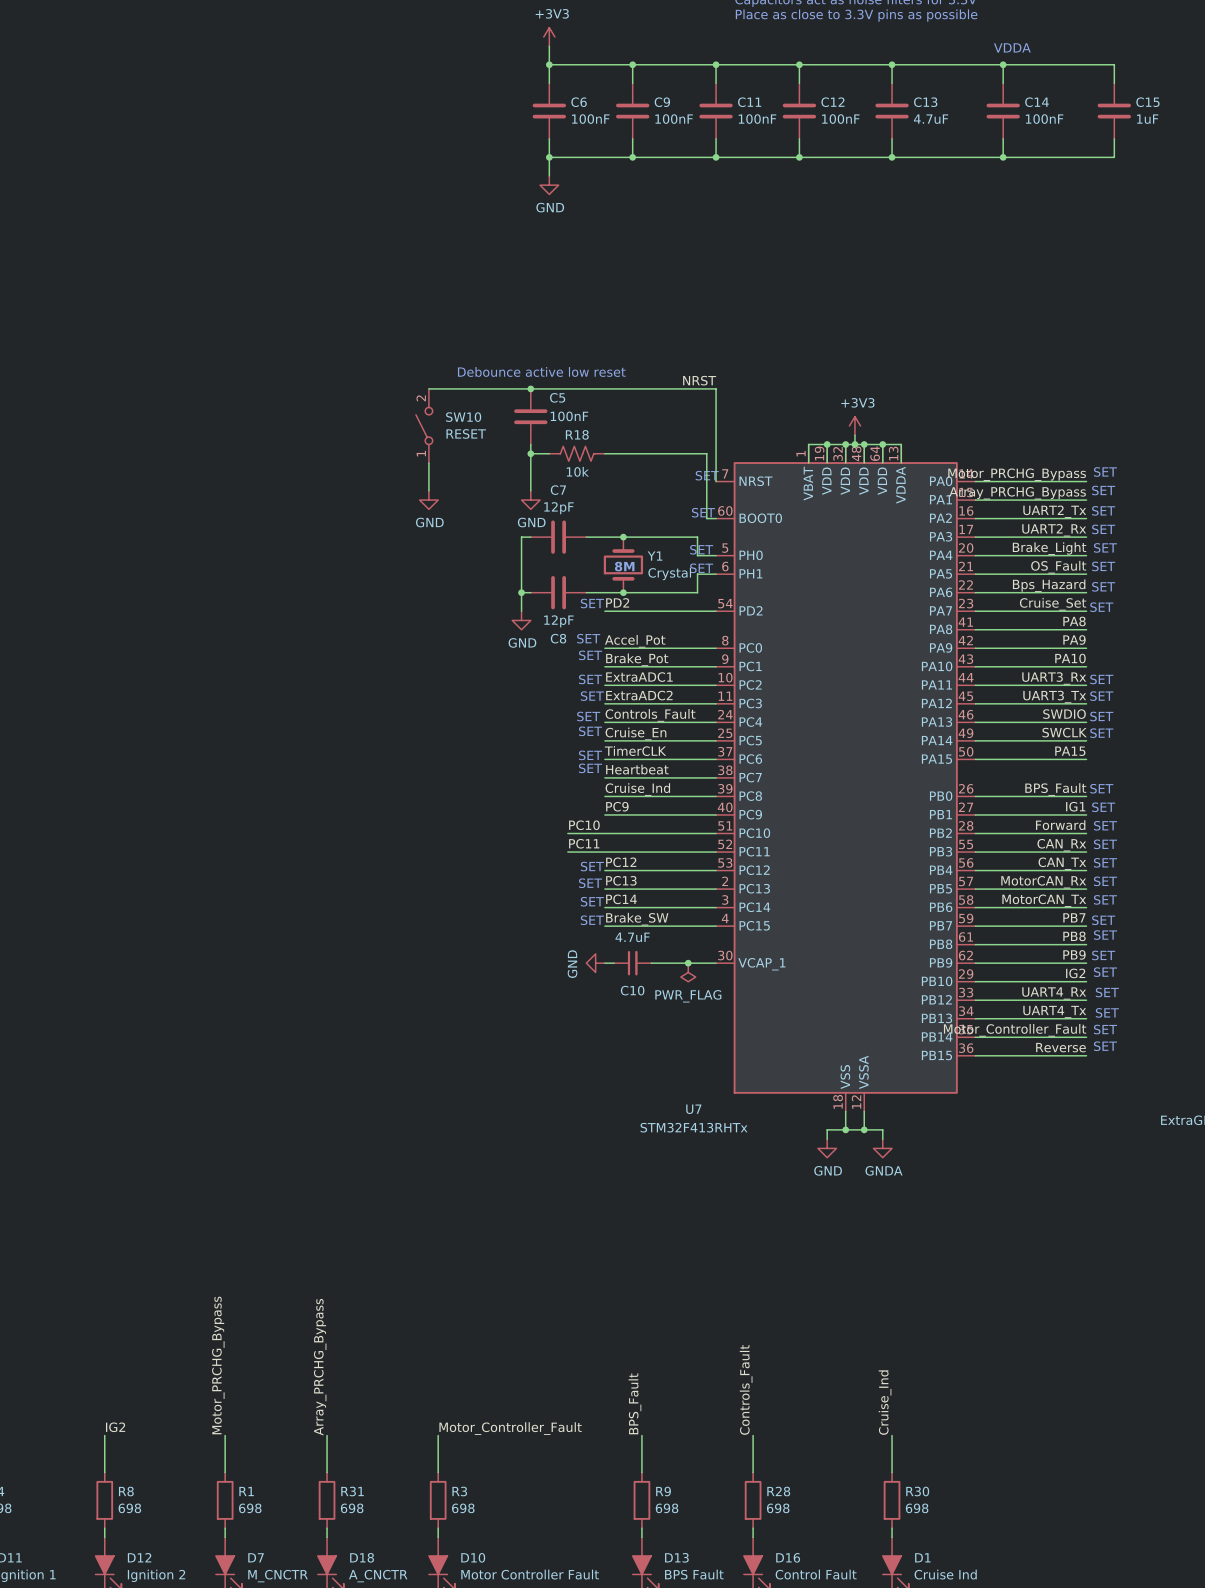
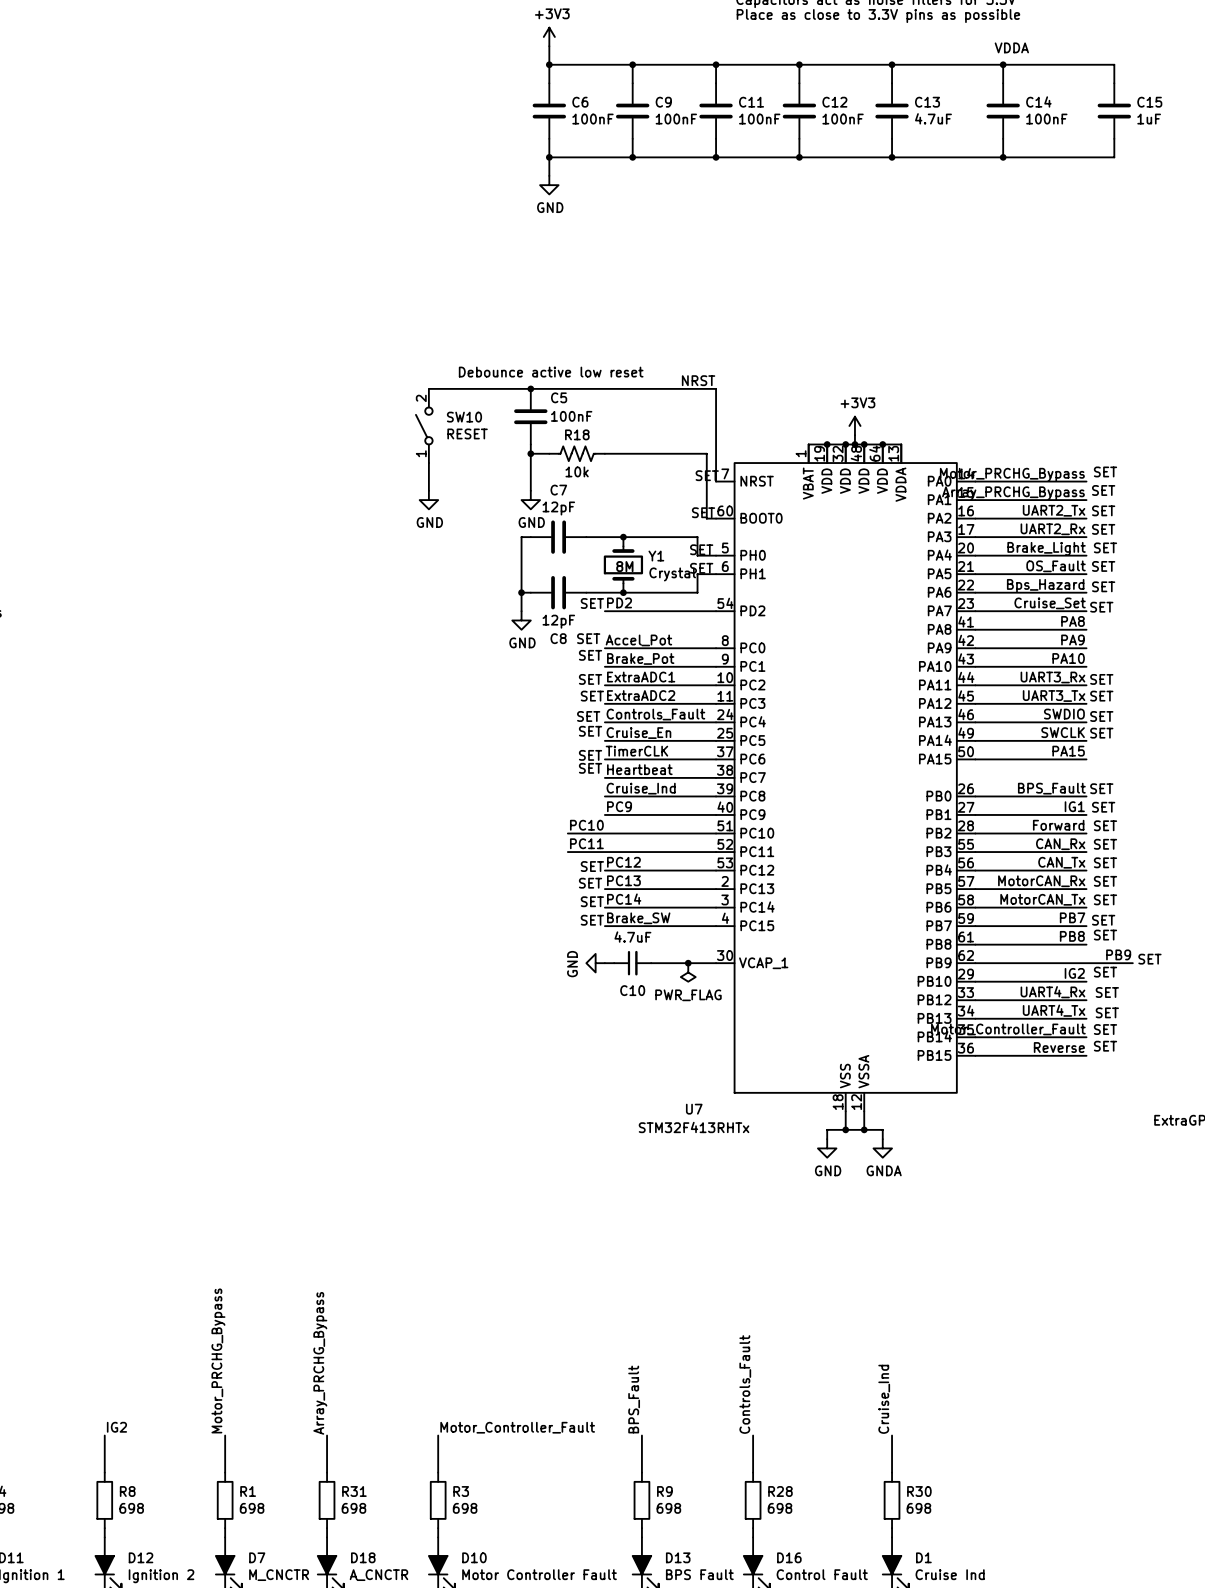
label position: PB9 (1074, 954) -> PB9 (1118, 954)
text position: SET (1103, 955) -> SET (1149, 959)
wire: none -> (1086, 963) (1132, 963)

